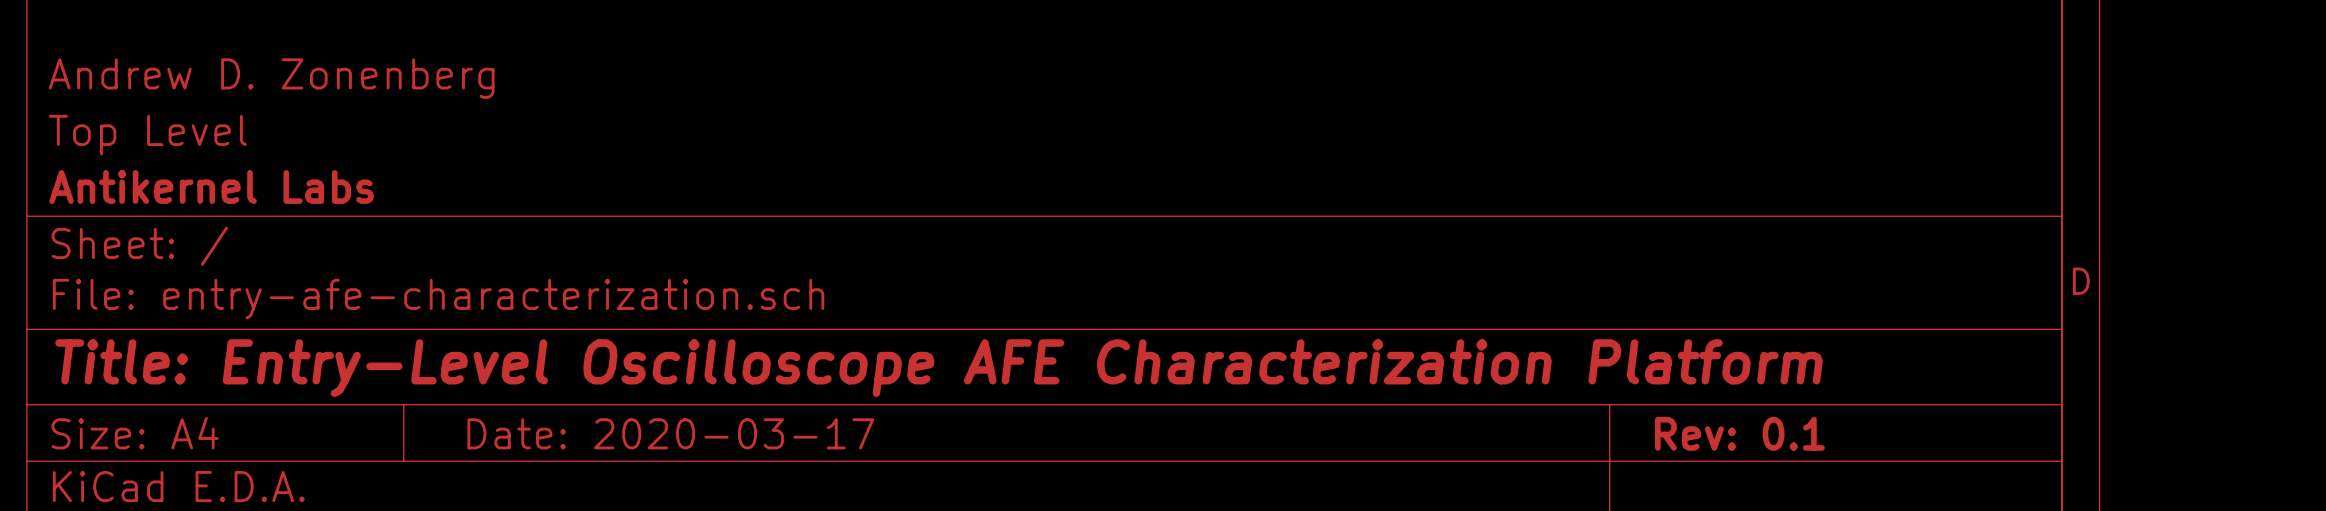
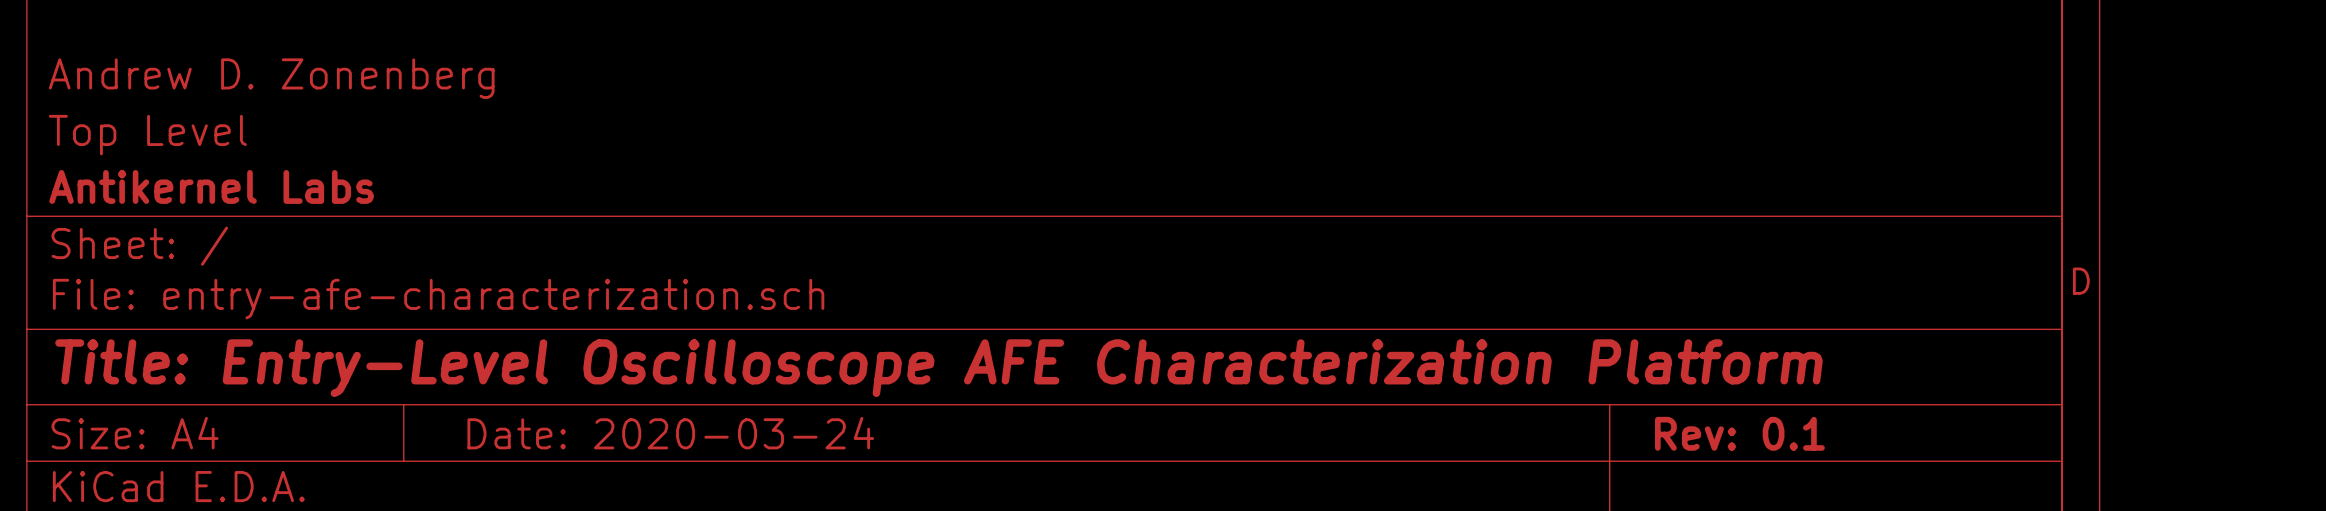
title block: Date: 2020-03-17 (670, 433) -> Date: 2020-03-24 (670, 433)

